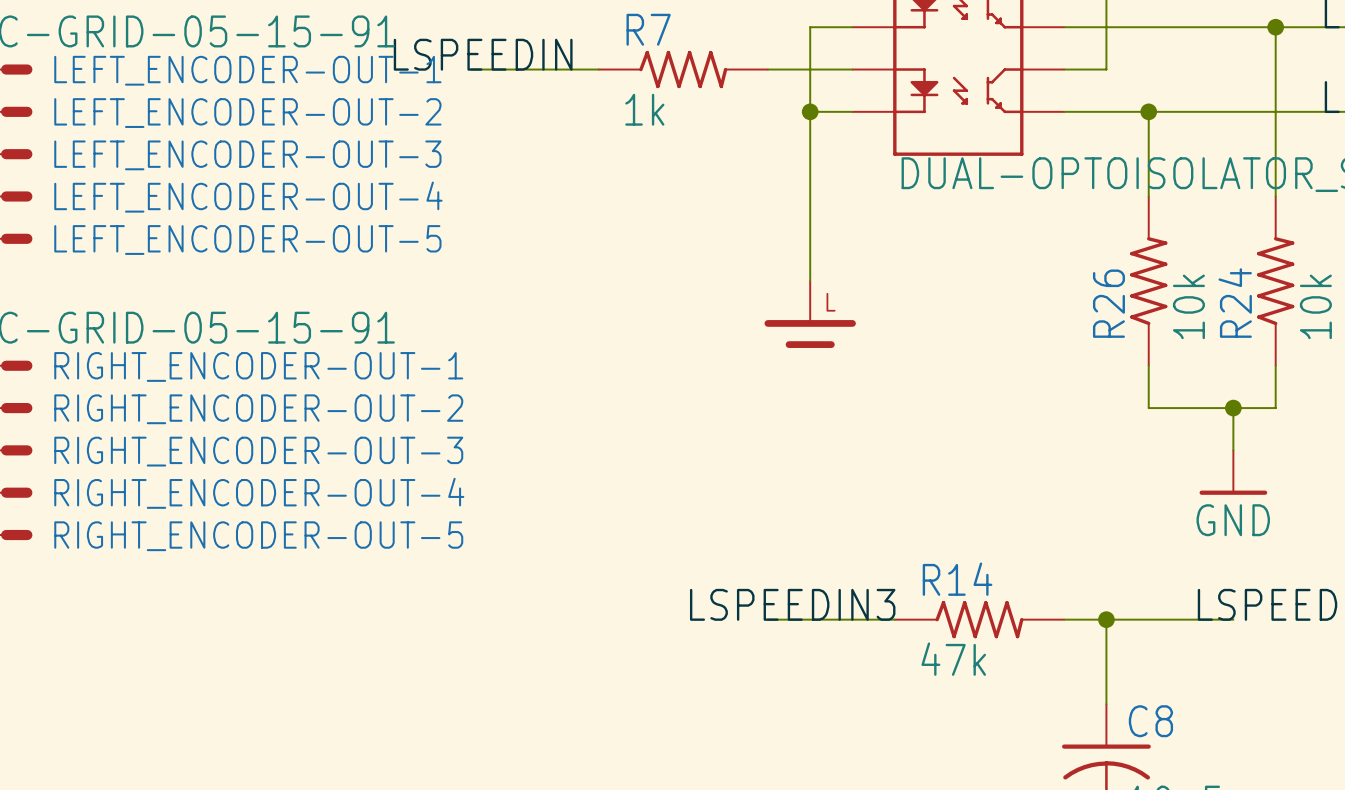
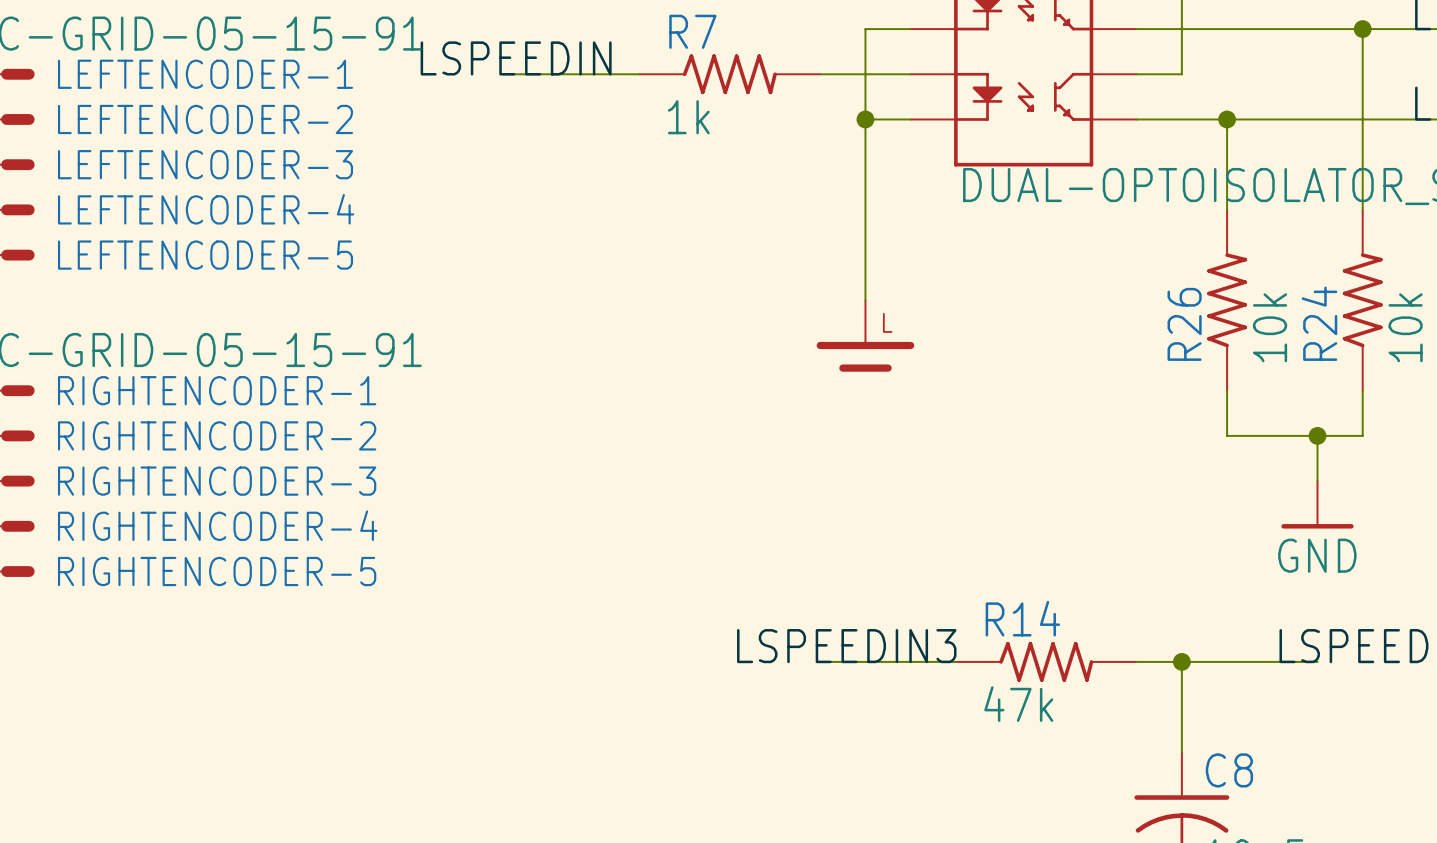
LEFT_ENCODER-OUT-1 name: LEFT_ENCODER-OUT-1 (247, 70) -> LEFTENCODER-1 (205, 74)
LEFT_ENCODER-OUT-2 name: LEFT_ENCODER-OUT-2 (247, 113) -> LEFTENCODER-2 (205, 119)
LEFT_ENCODER-OUT-3 name: LEFT_ENCODER-OUT-3 (247, 155) -> LEFTENCODER-3 (205, 164)
LEFT_ENCODER-OUT-4 name: LEFT_ENCODER-OUT-4 (248, 197) -> LEFTENCODER-4 (206, 209)
LEFT_ENCODER-OUT-5 name: LEFT_ENCODER-OUT-5 (247, 240) -> LEFTENCODER-5 (205, 255)
RIGHT_ENCODER-OUT-1 name: RIGHT_ENCODER-OUT-1 (258, 366) -> RIGHTENCODER-1 (217, 390)
RIGHT_ENCODER-OUT-2 name: RIGHT_ENCODER-OUT-2 (258, 409) -> RIGHTENCODER-2 (217, 435)
RIGHT_ENCODER-OUT-3 name: RIGHT_ENCODER-OUT-3 (258, 451) -> RIGHTENCODER-3 (217, 481)
RIGHT_ENCODER-OUT-4 name: RIGHT_ENCODER-OUT-4 (259, 493) -> RIGHTENCODER-4 (217, 525)
RIGHT_ENCODER-OUT-5 name: RIGHT_ENCODER-OUT-5 (258, 536) -> RIGHTENCODER-5 (217, 571)

